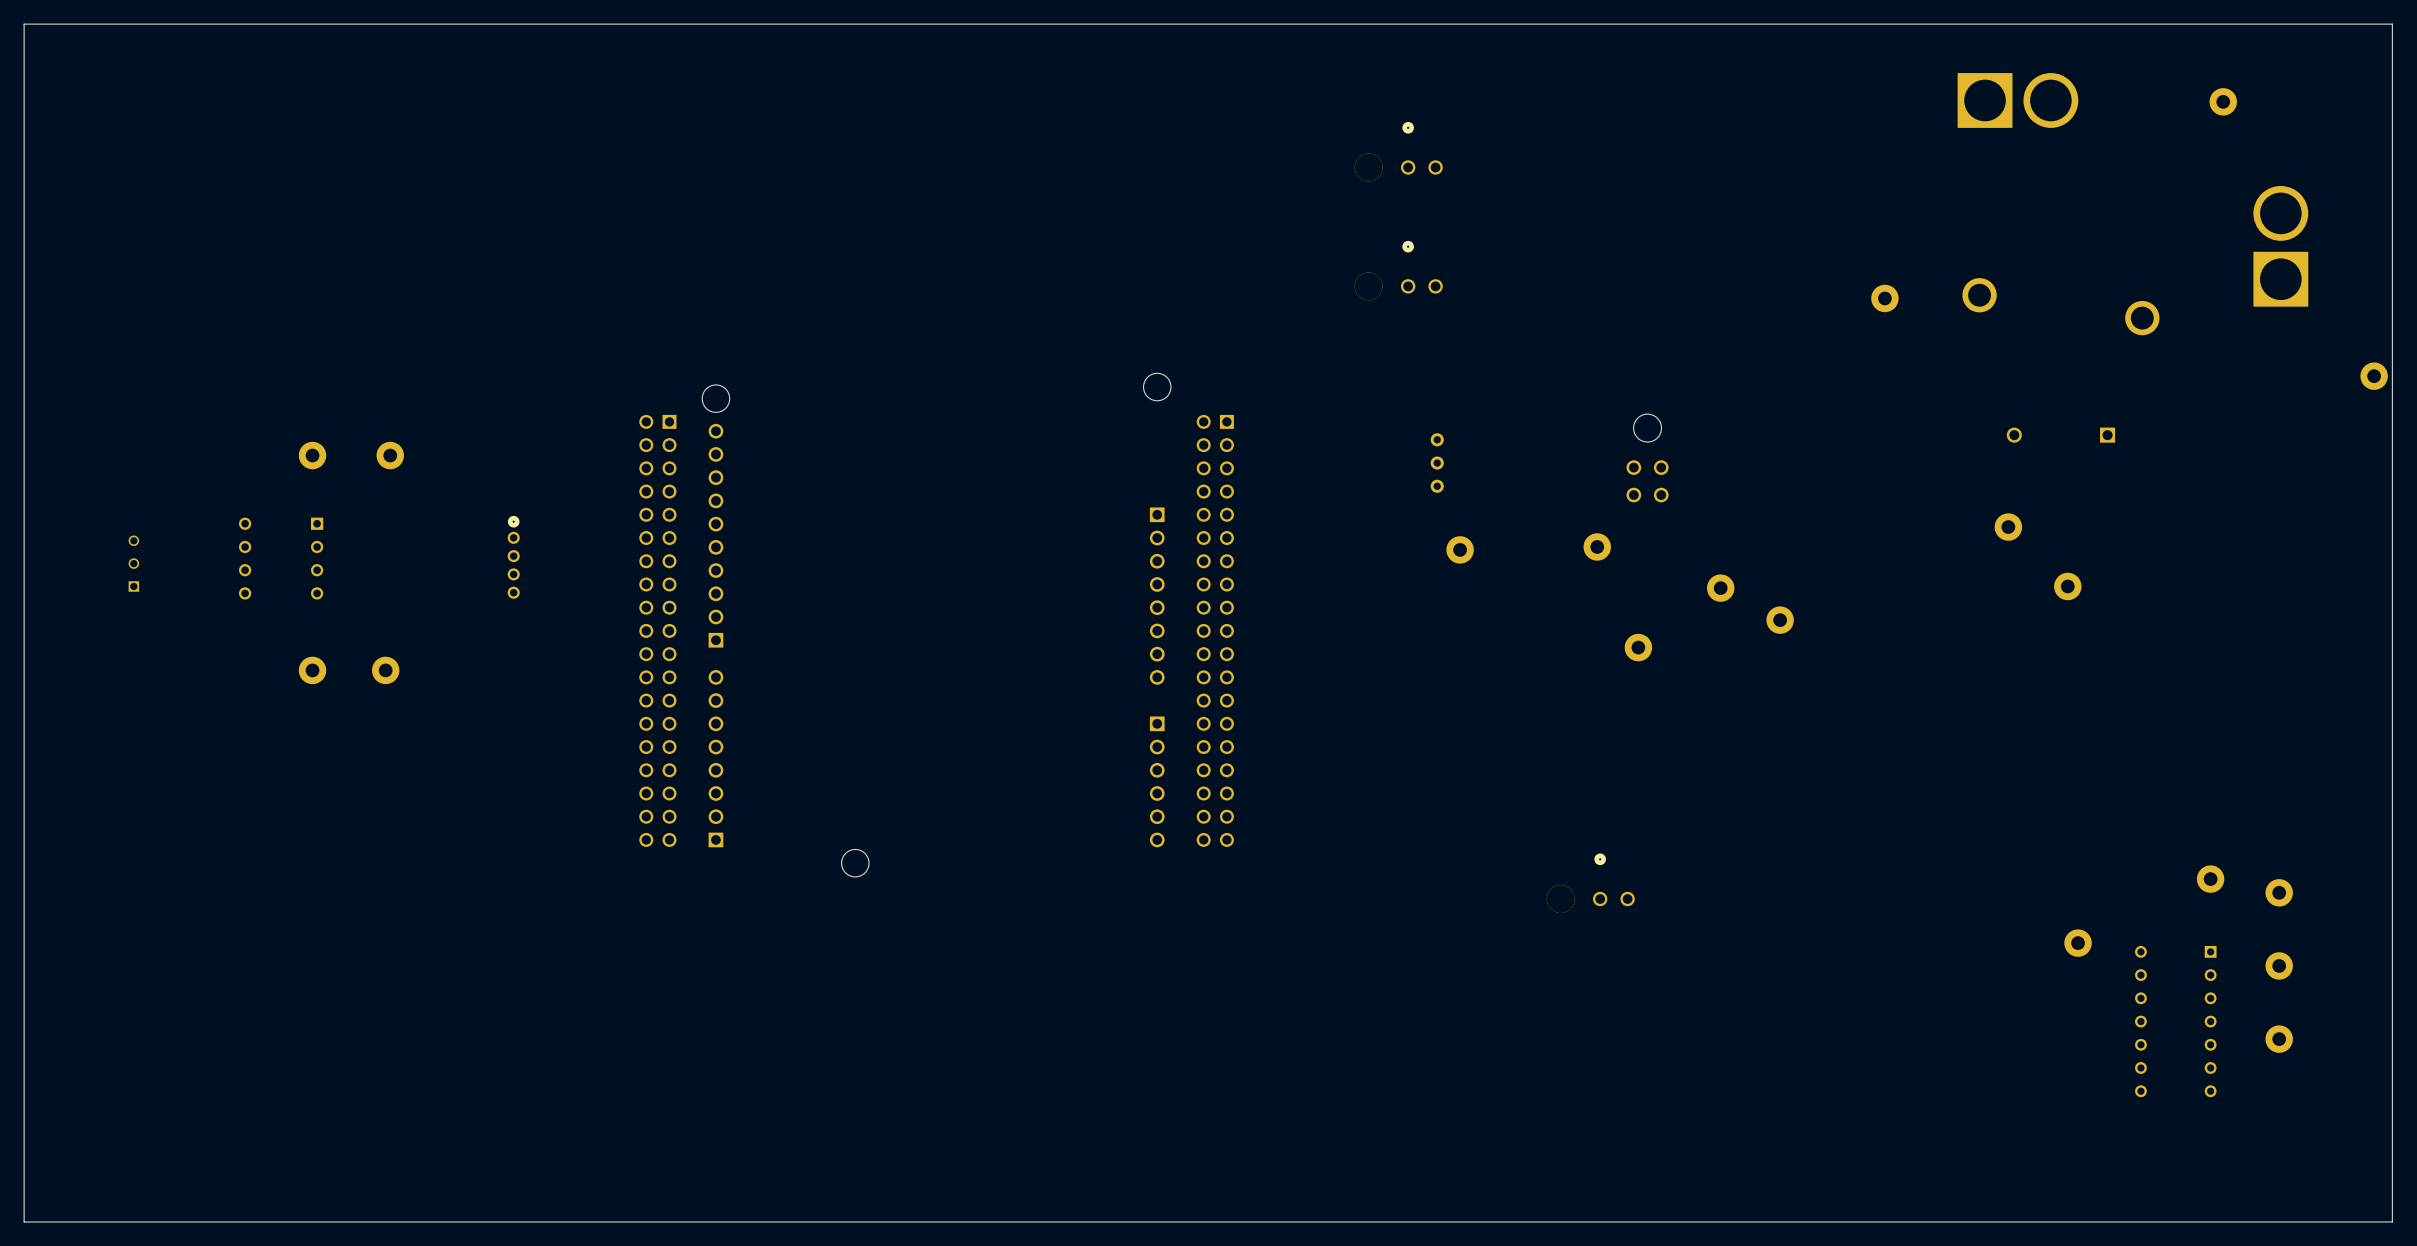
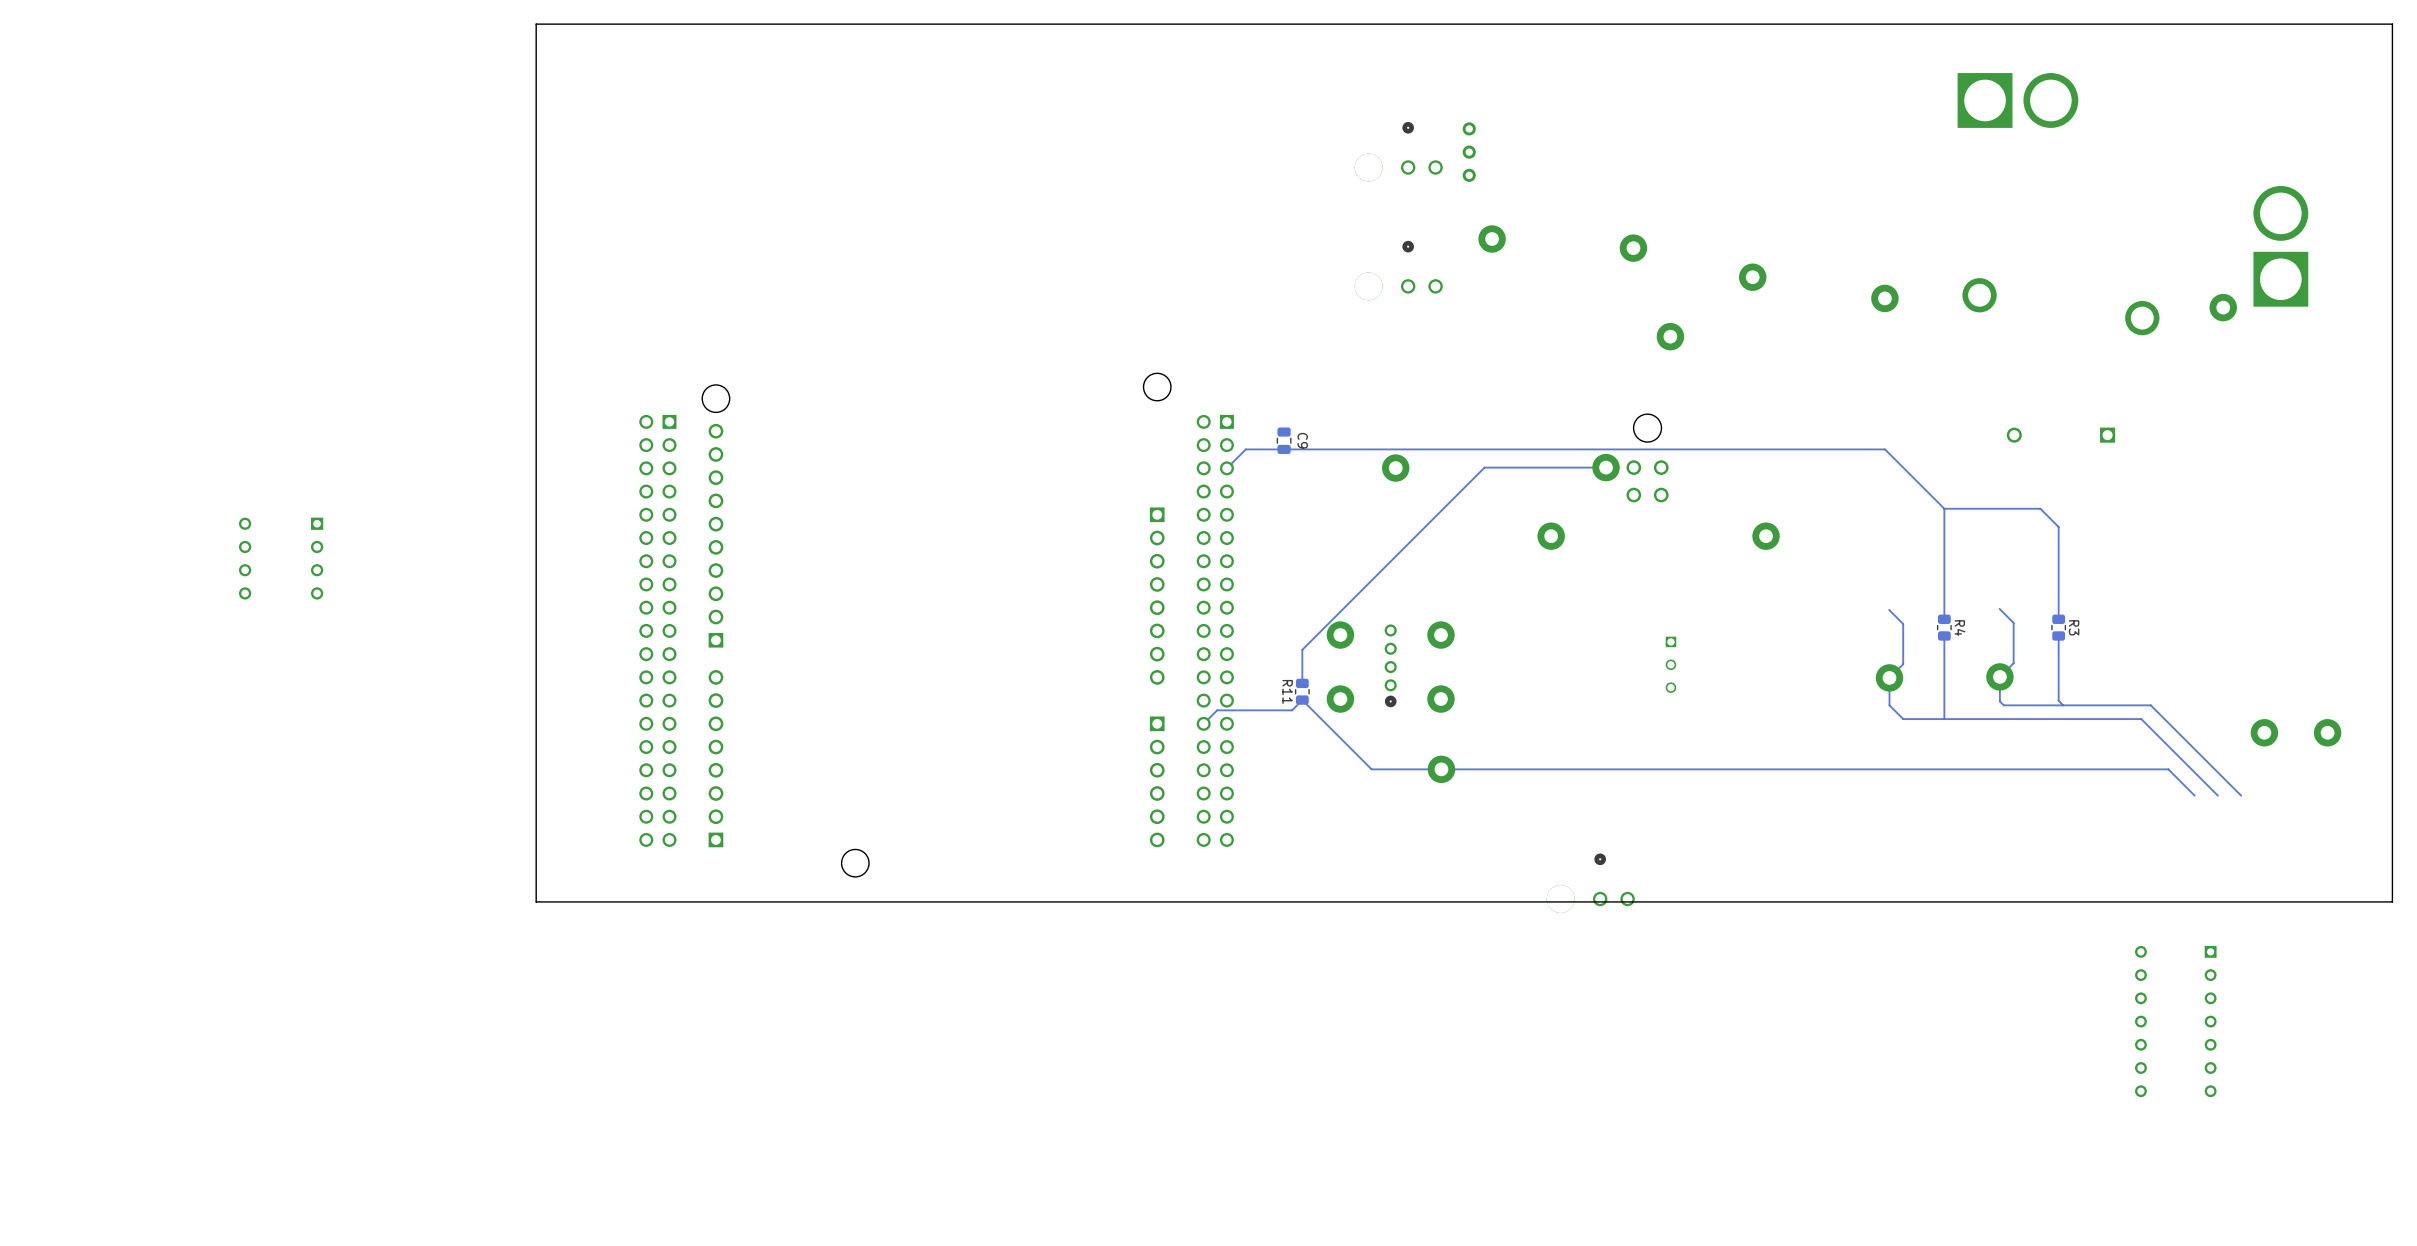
board edge: (536, 24) (24, 24) (24, 1221) (2392, 1221) (2392, 901) -> (536, 24) (536, 901) (2392, 901)
part: (2223, 101) -> none
part: none -> (1469, 152)
part: none -> (1492, 239)
part: none -> (1633, 248)
part: none -> (1752, 277)
part: none -> (2223, 307)
part: none -> (1670, 336)
part: (2374, 376) -> none
C9: none -> (1284, 440)
part: (312, 455) -> none
part: (390, 455) -> none
part: (1437, 463) -> none
track: none -> (1606, 467) (1484, 467) (1302, 649) (1302, 683)
part: none -> (1606, 467)
track: none -> (1226, 468) (1245, 449) (1885, 449) (1944, 508)
part: none -> (1395, 468)
track: none -> (1944, 508) (1944, 619)
track: none -> (1944, 508) (2040, 508) (2058, 527) (2058, 619)
part: (2008, 527) -> none
part: none -> (1551, 536)
part: none -> (1766, 536)
part: (1597, 546) -> none
part: (1460, 549) -> none
part: (513, 557) -> none
part: (133, 563) -> none
part: (2067, 586) -> none
part: (1720, 588) -> none
track: none -> (1999, 608) (2013, 622) (2013, 663) (1999, 676) (1999, 701) (2003, 705) (2150, 705) (2241, 795)
track: none -> (1889, 609) (1903, 623) (1903, 664) (1889, 677) (1889, 705) (1903, 719) (2141, 719) (2217, 795)
part: (1780, 620) -> none
R4: none -> (1944, 627)
R3: none -> (2058, 627)
part: none -> (1340, 635)
part: none -> (1440, 635)
track: none -> (1944, 635) (1944, 719)
track: none -> (2058, 635) (2058, 700) (2063, 705)
part: (1638, 647) -> none
part: none -> (1670, 664)
part: none -> (1390, 665)
part: (312, 670) -> none
part: (385, 670) -> none
part: none -> (1999, 676)
part: none -> (1889, 677)
R11: none -> (1302, 691)
part: none -> (1340, 699)
part: none -> (1440, 699)
track: none -> (1203, 723) (1217, 710) (1292, 710) (1302, 700) (1371, 769) (2168, 769) (2194, 795)
part: none -> (2264, 732)
part: none -> (2327, 732)
part: none -> (1441, 769)
part: (2210, 879) -> none
part: (2279, 892) -> none
part: (2078, 943) -> none
part: (2279, 965) -> none
part: (2279, 1039) -> none

